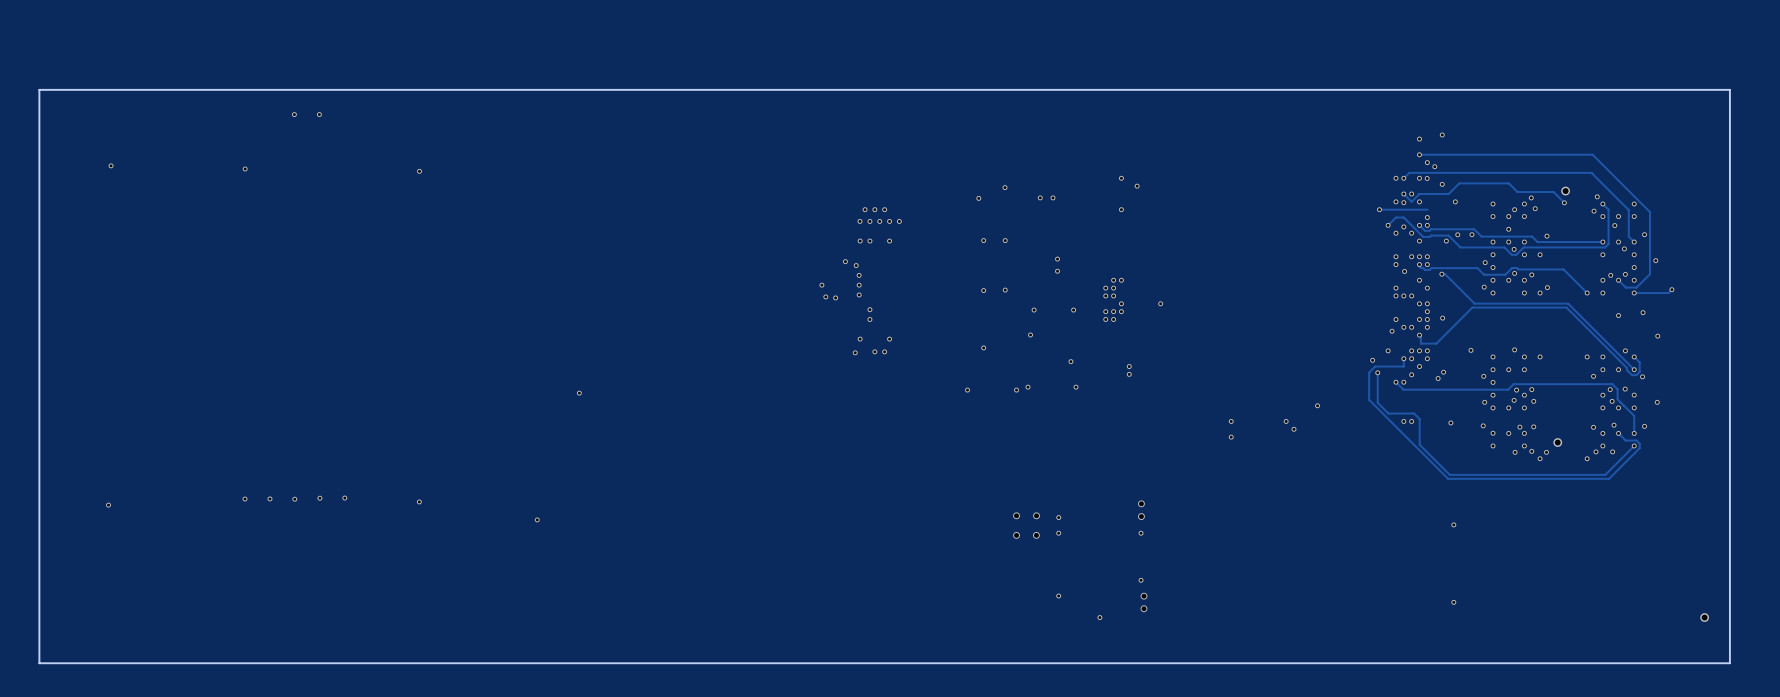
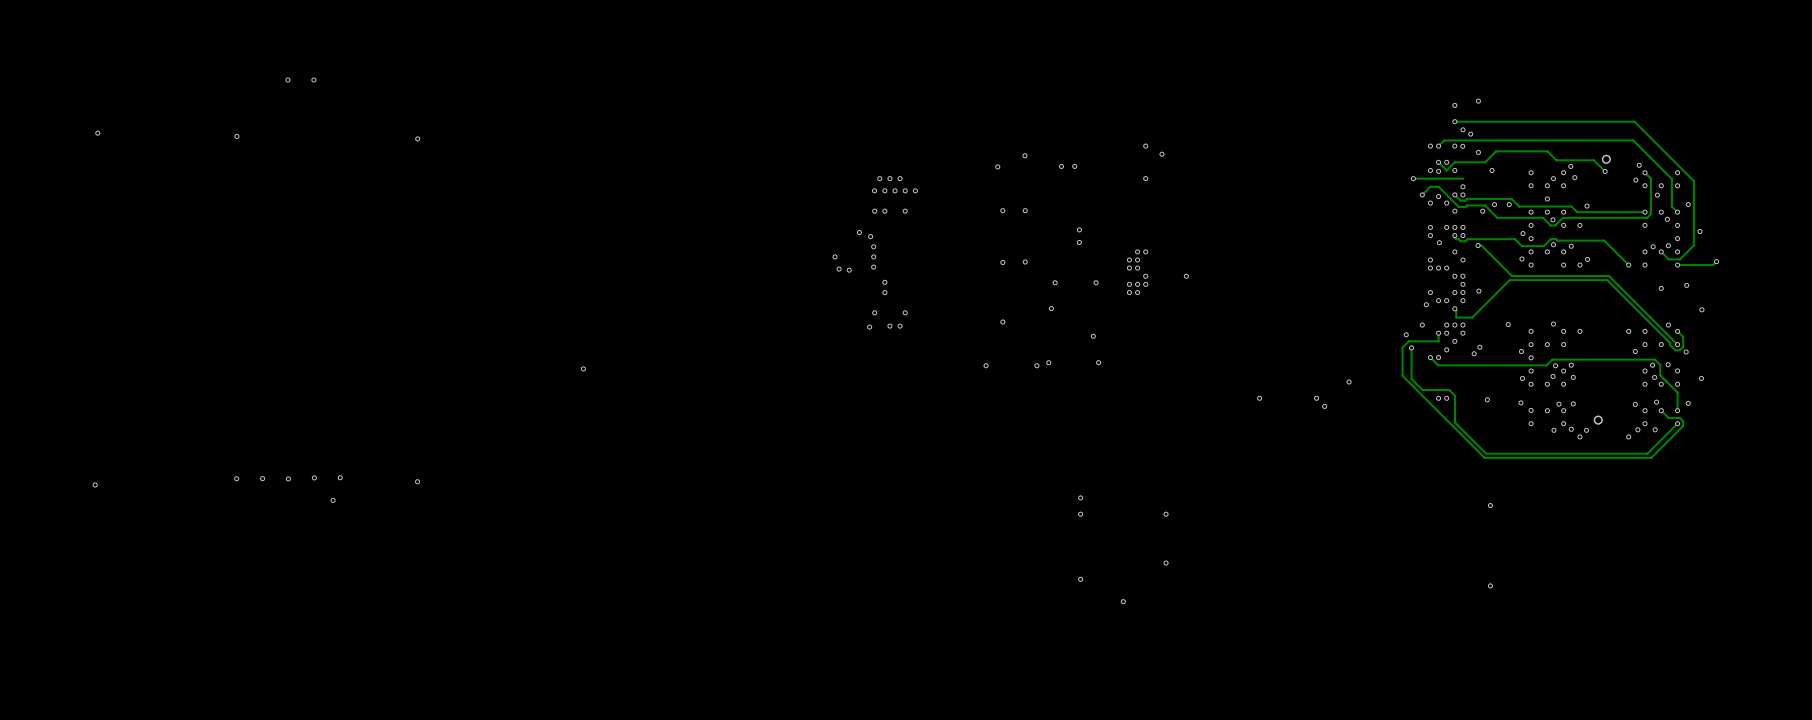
board edge: (1729, 89) (39, 89) (39, 663) (1729, 663) (1729, 89) -> none
via: (1129, 366) -> none
via: (1129, 374) -> none
via: (1231, 437) -> none
via: (1141, 503) -> none
via: (1016, 515) -> none
via: (1036, 515) -> none
via: (1141, 516) -> none
via: none -> (333, 500)
via: (537, 519) -> none
via: (1016, 535) -> none
via: (1036, 535) -> none
via: (1143, 596) -> none
via: (1143, 608) -> none
via: (1704, 617) -> none

